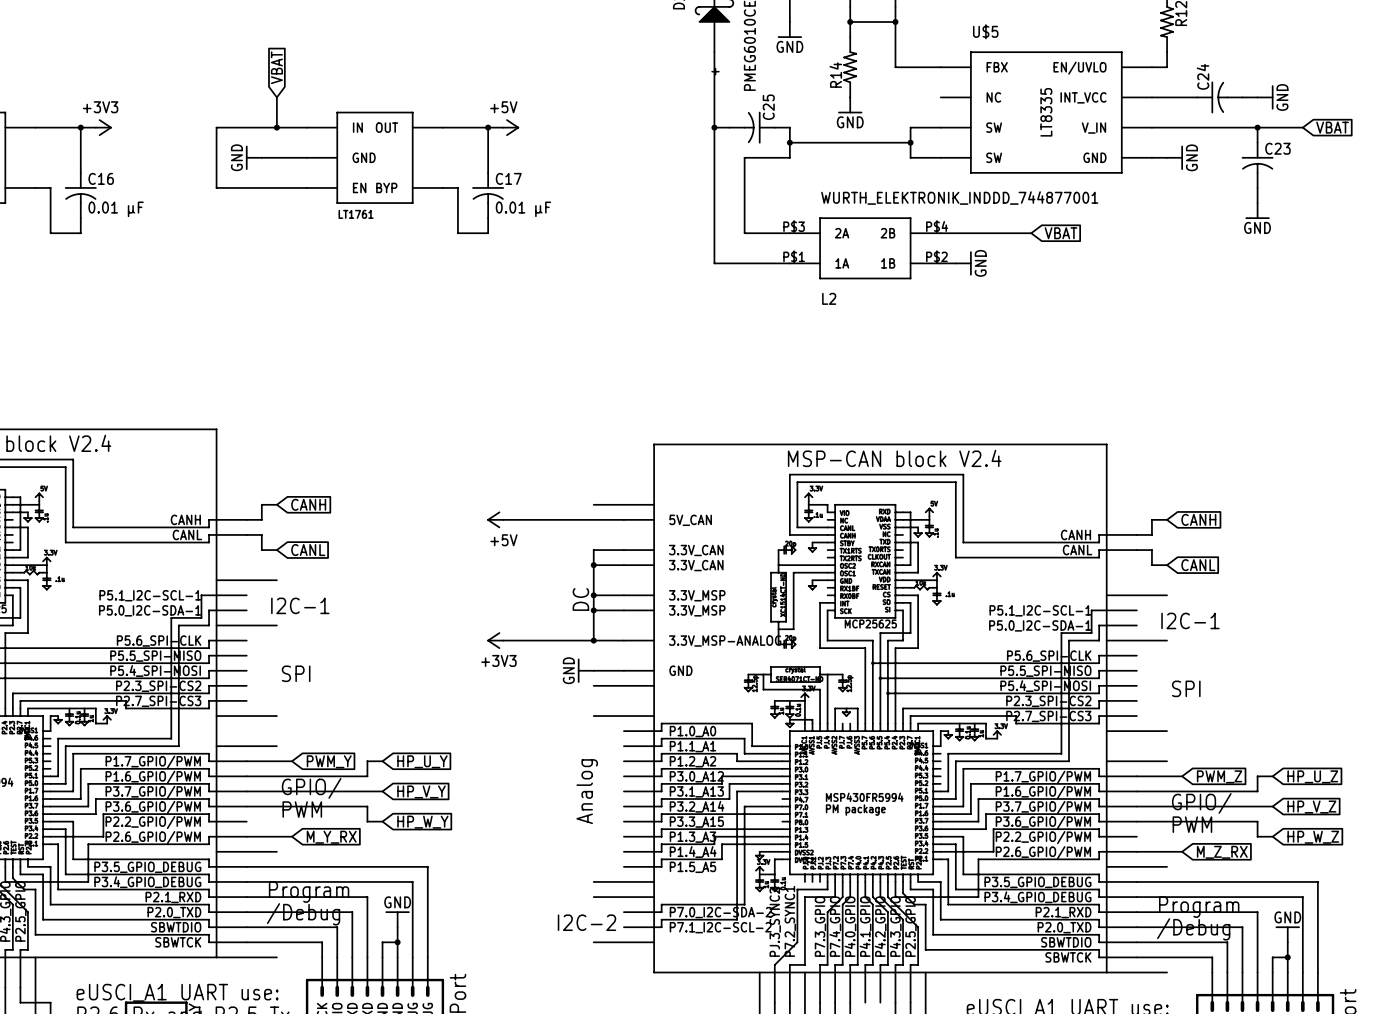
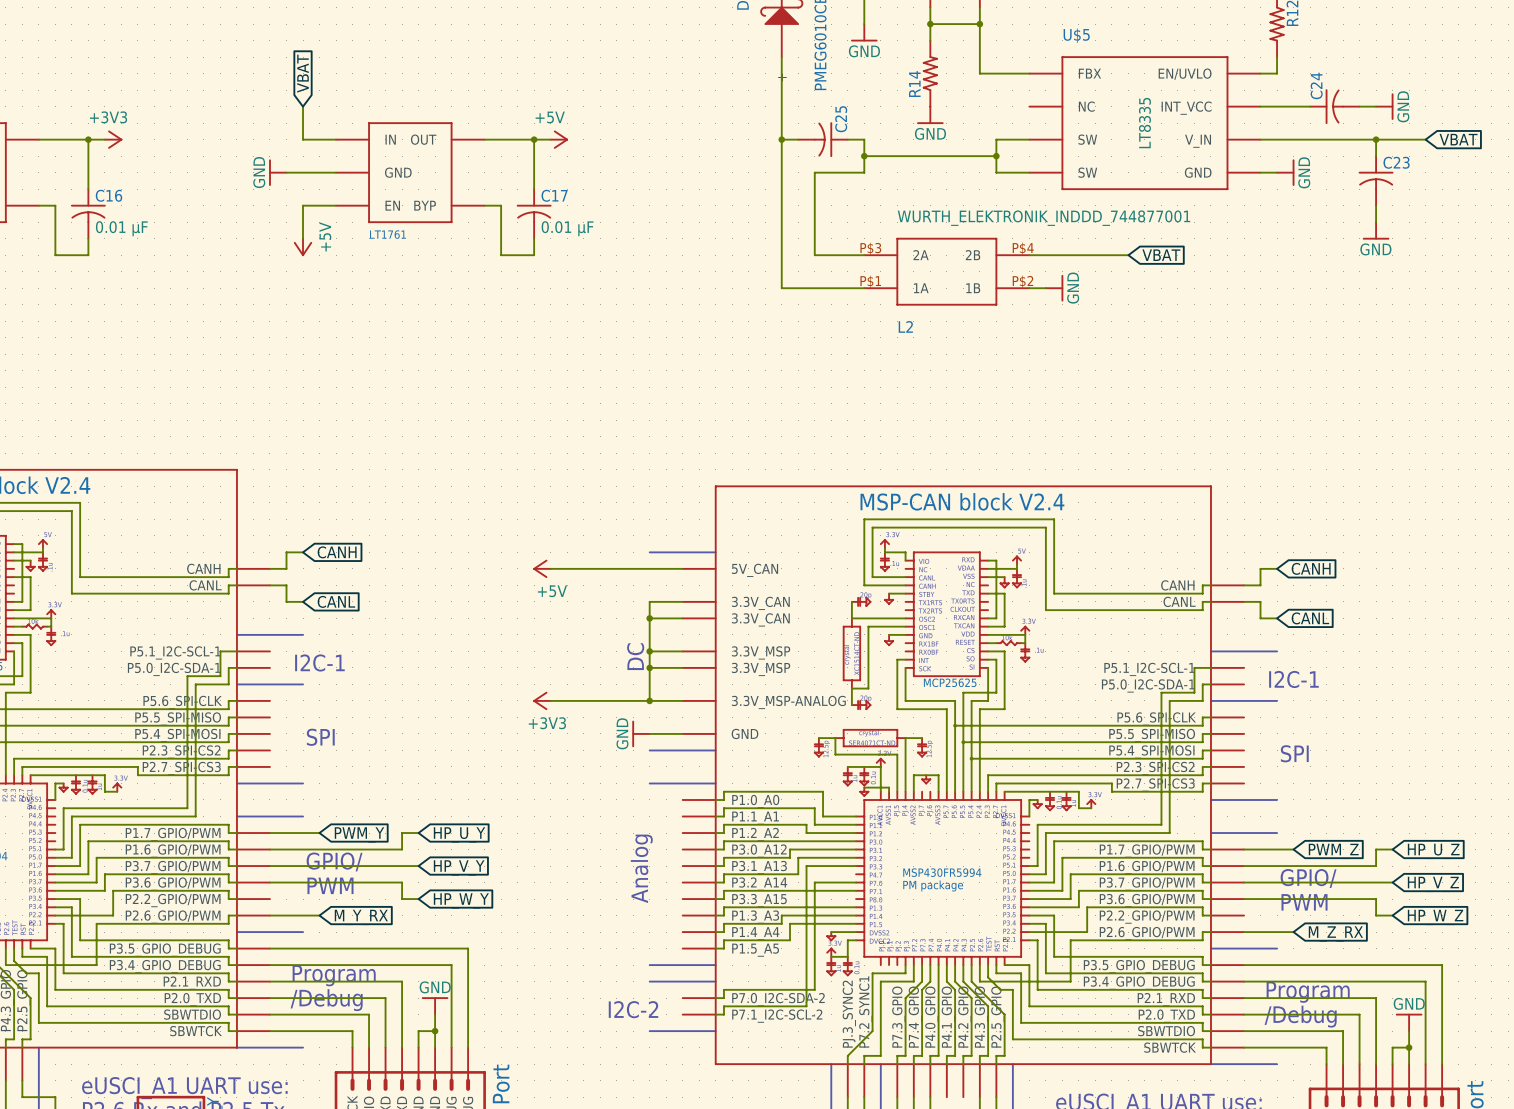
wire: (276, 127) (216, 127) (216, 187) (276, 187) -> (303, 238) (303, 205)
junction: (276, 127) -> none
power symbol: none -> +5V (303, 247)

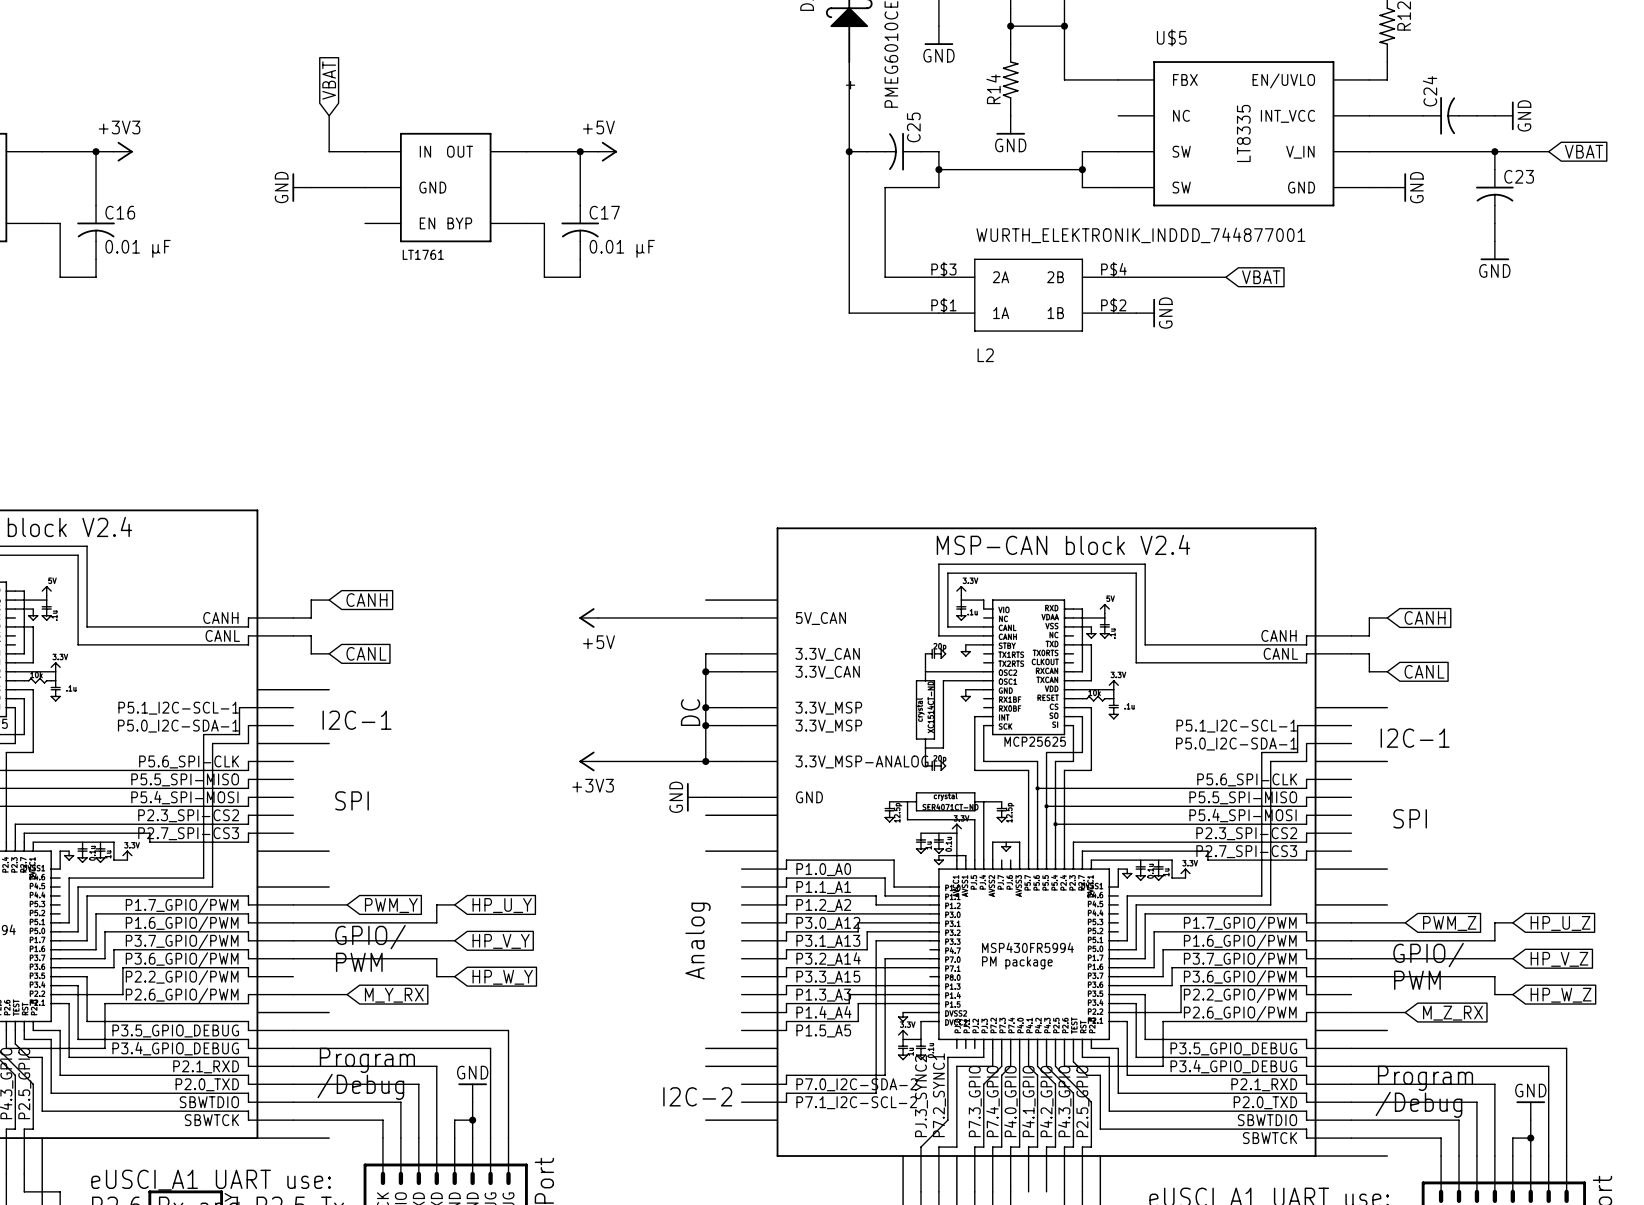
wire: (336, 205) (303, 205) (303, 238) -> none
power symbol: +5V (303, 247) -> none

